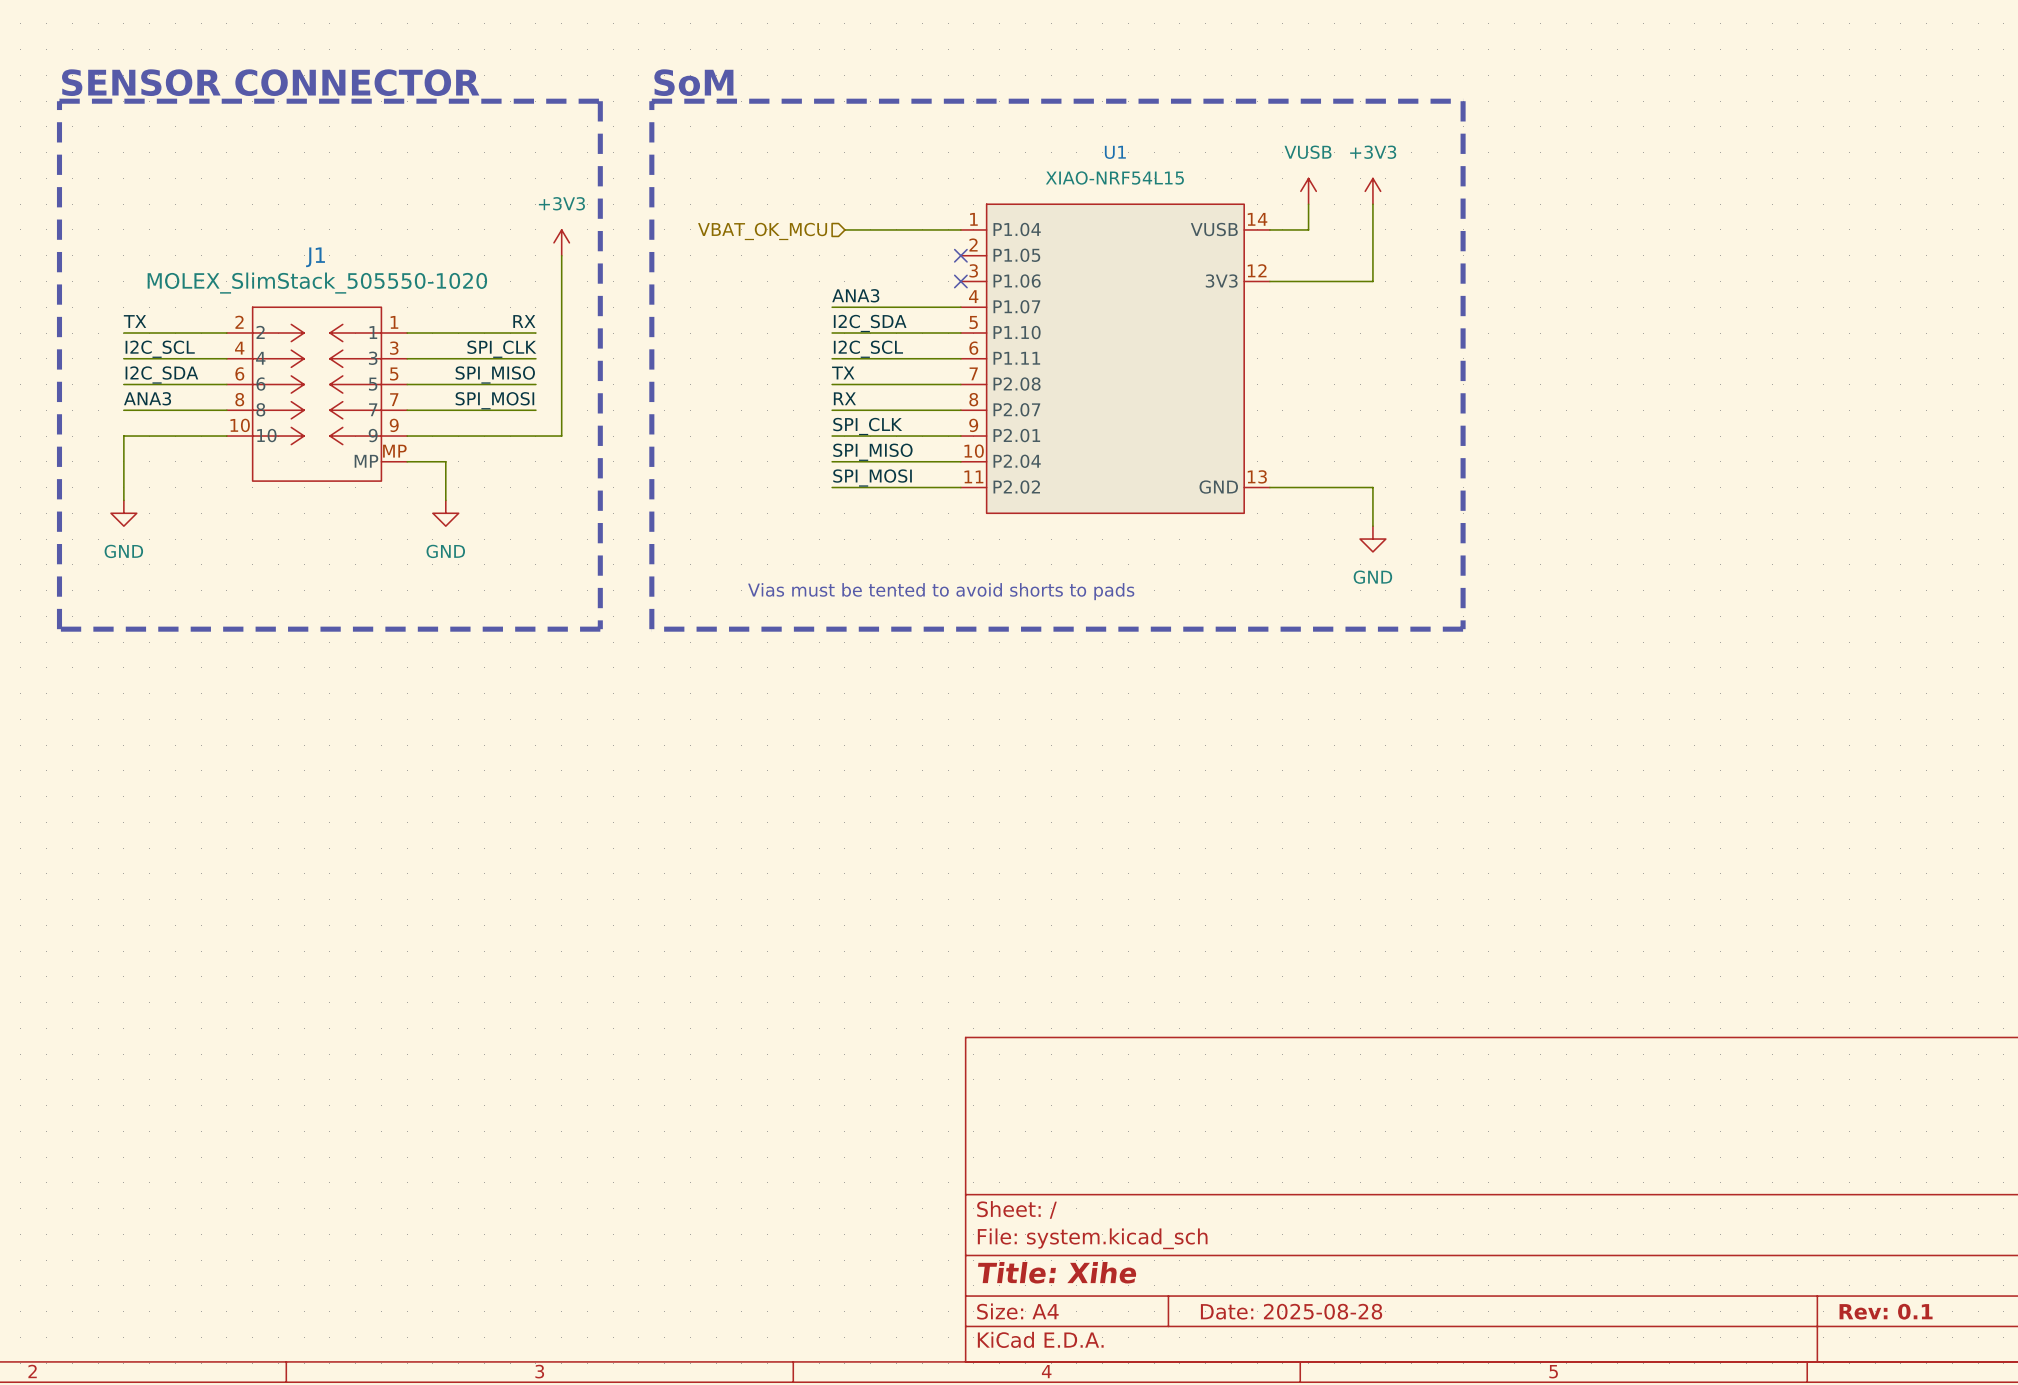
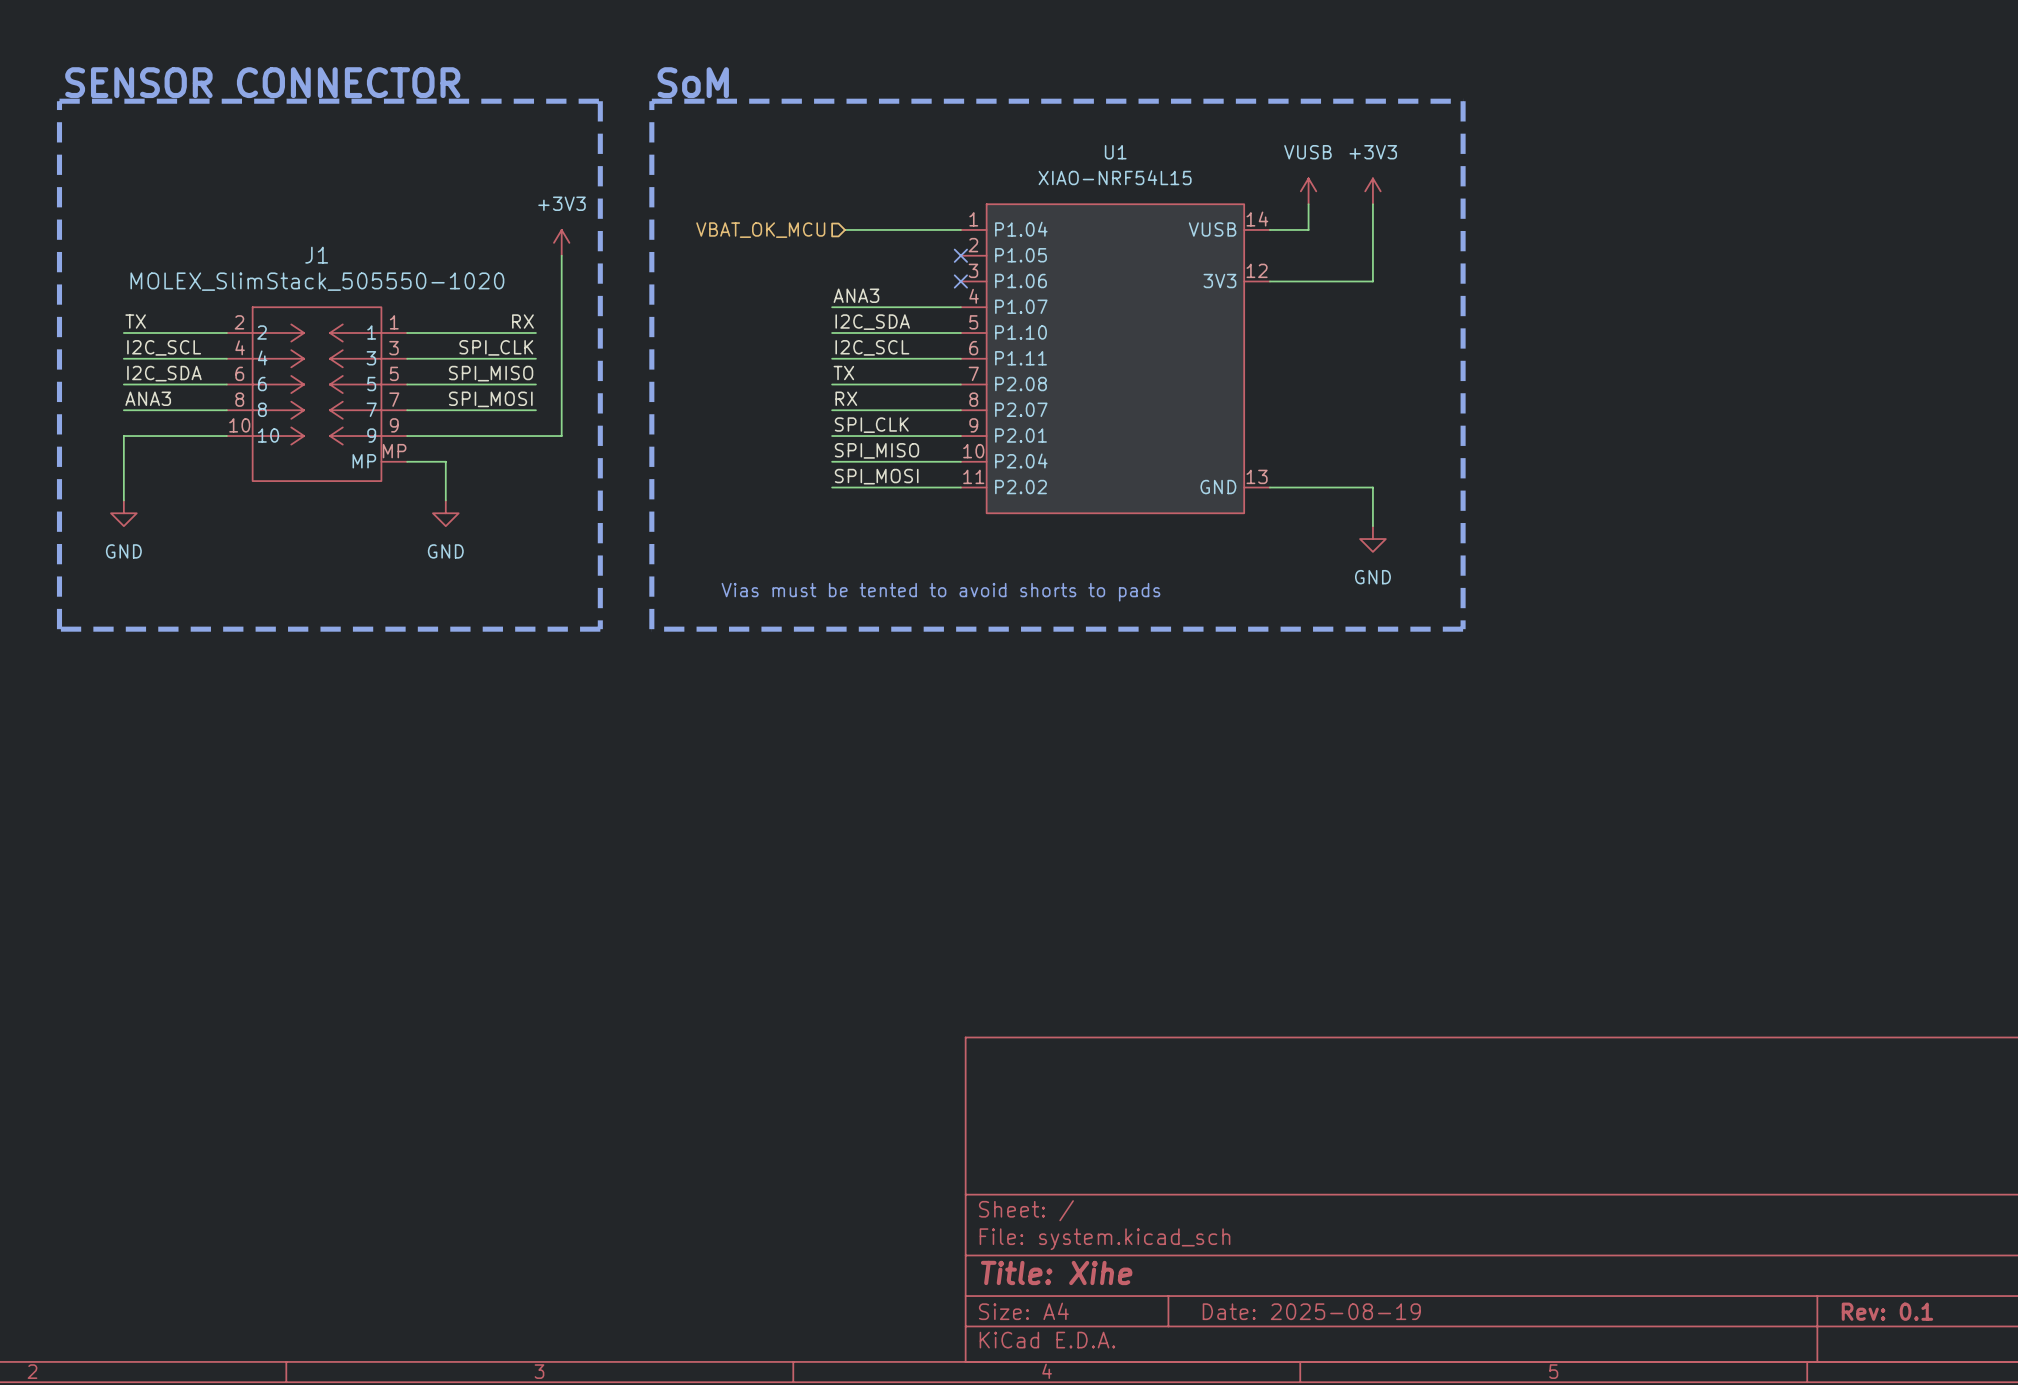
title block: Date: 2025-08-28 (1291, 1311) -> Date: 2025-08-19 (1311, 1311)

